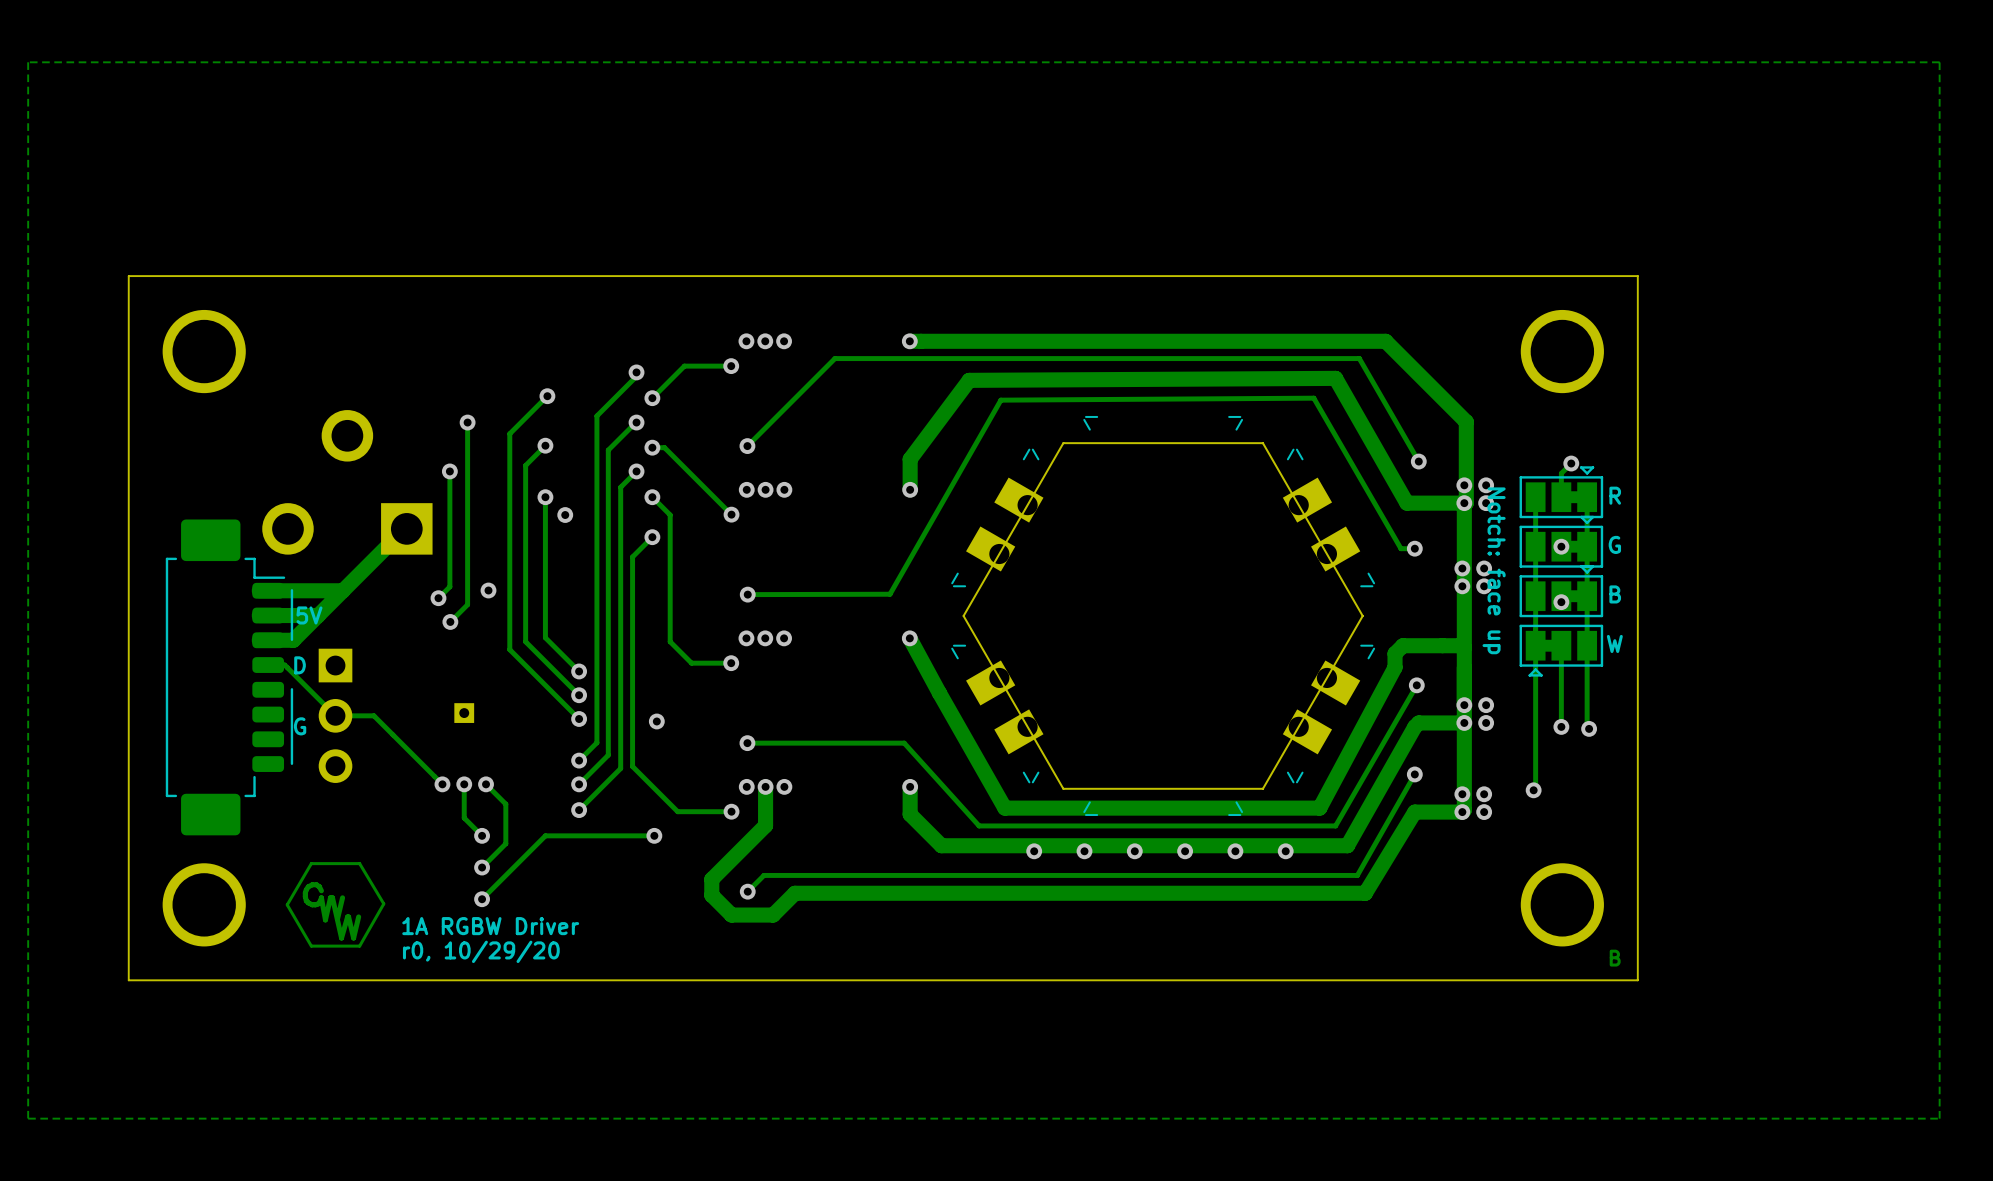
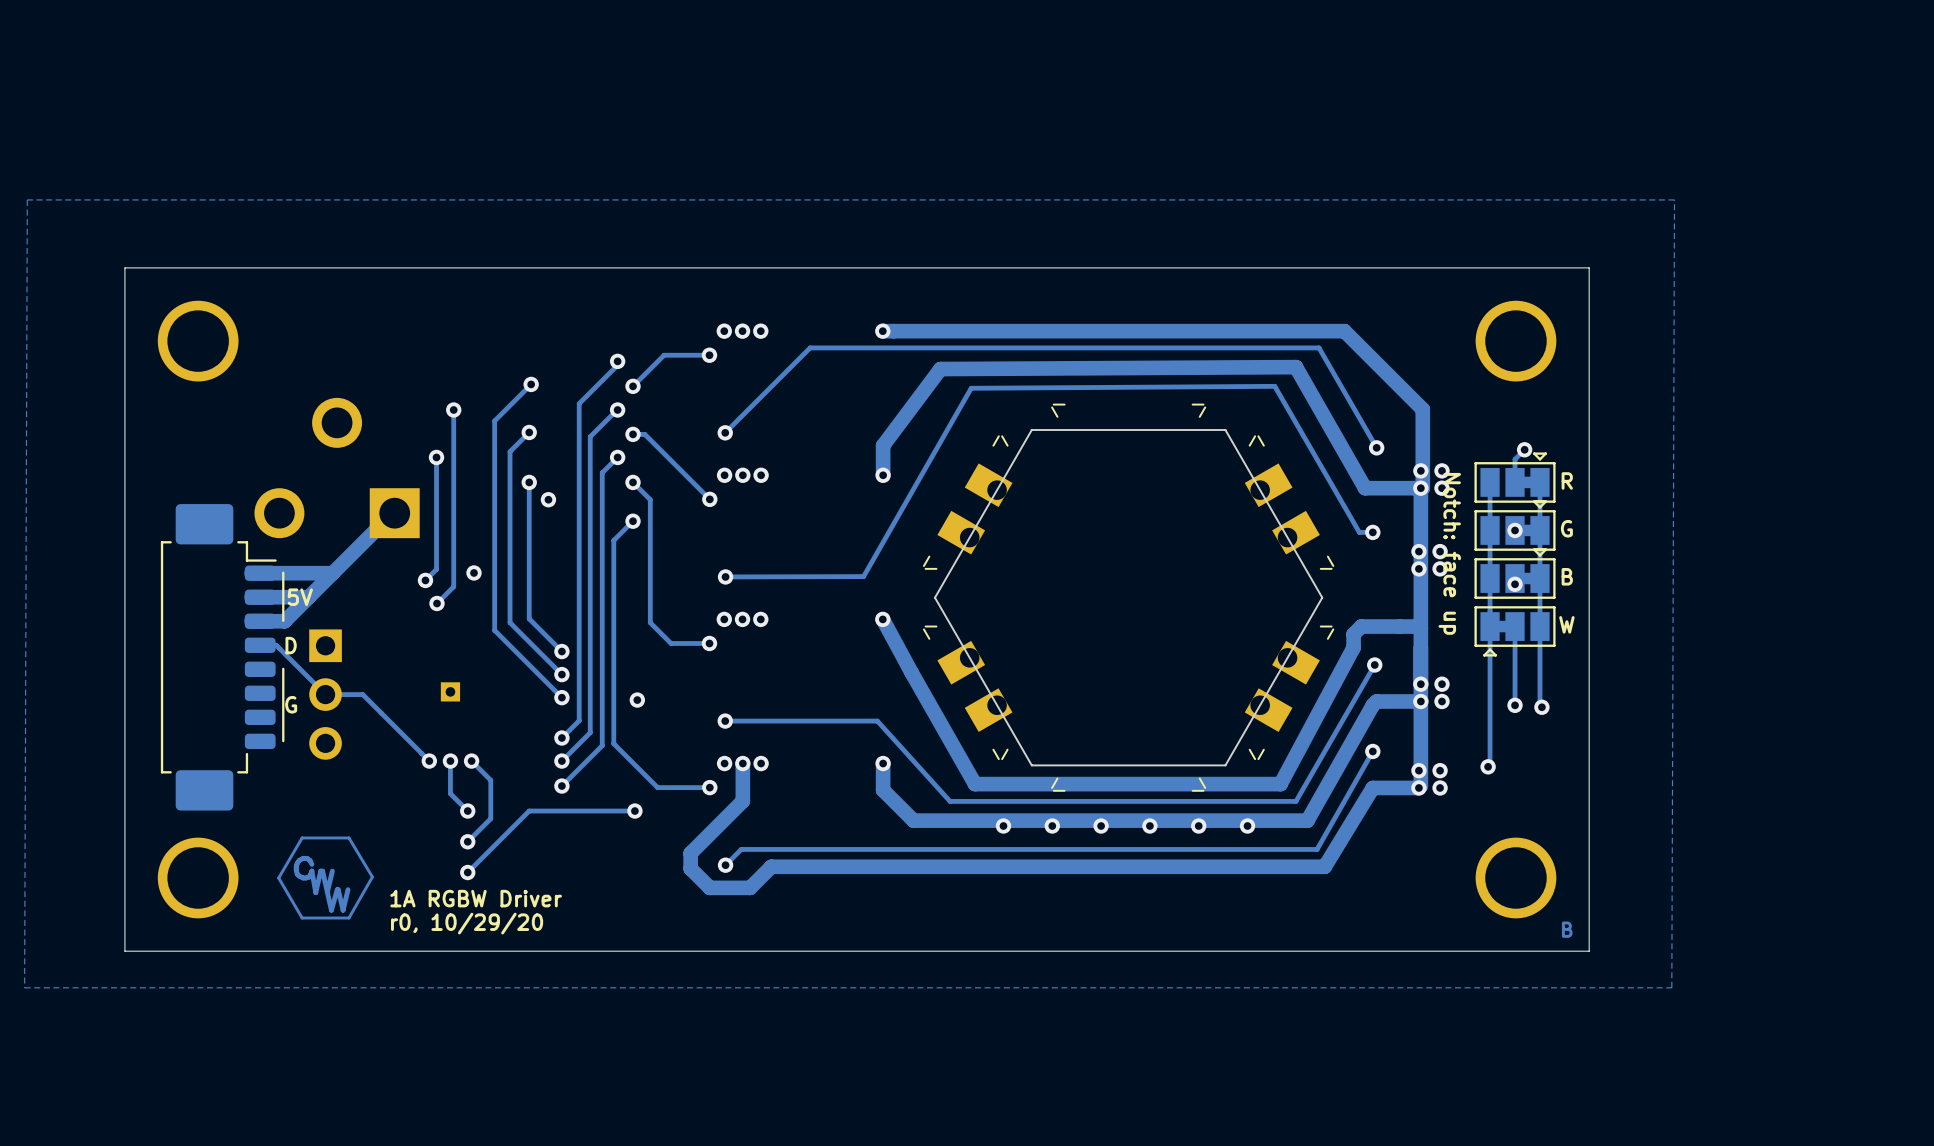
zone outline: (1939, 62) (1939, 1118) (28, 1118) (28, 62) (1939, 62) -> (1674, 199) (1671, 987) (24, 987) (27, 199) (1674, 199)

